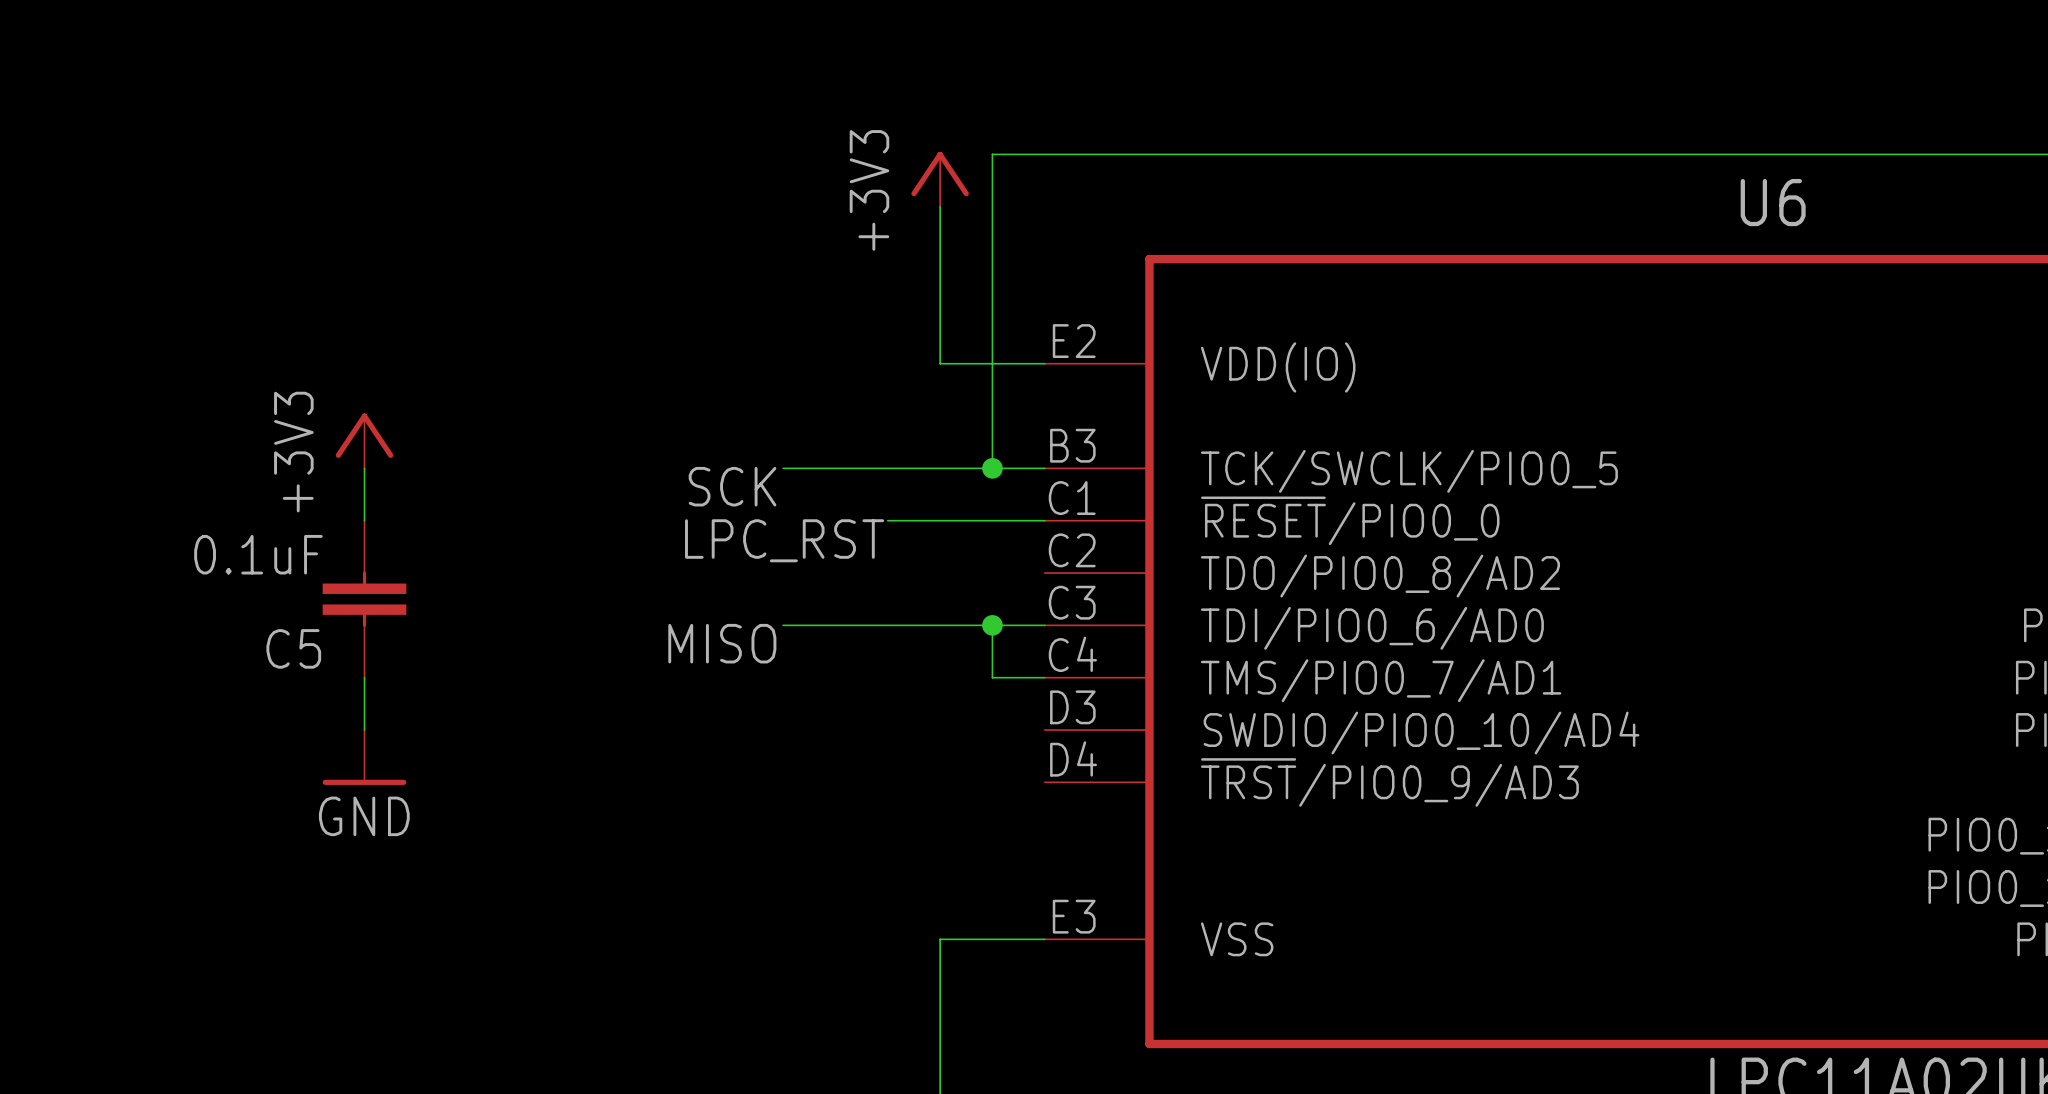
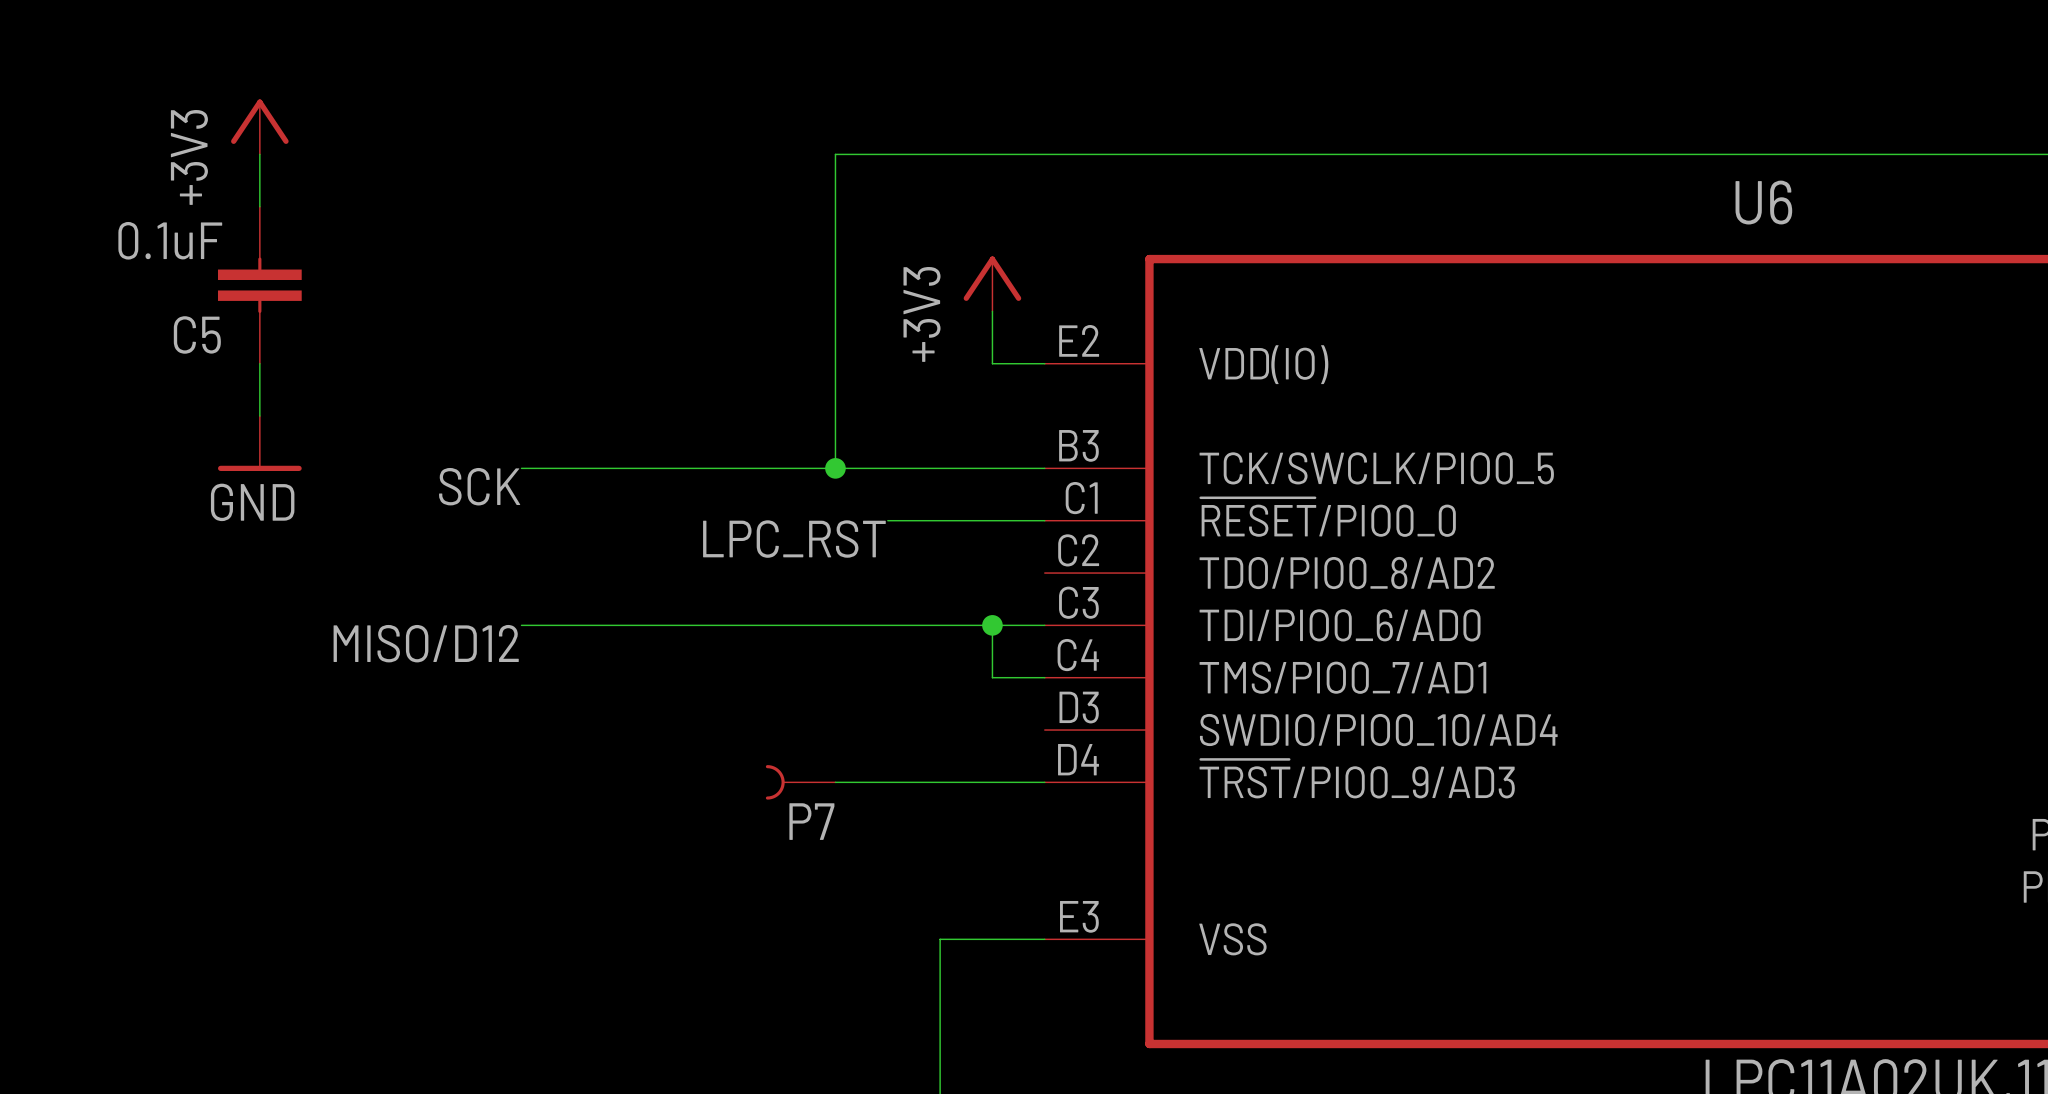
power symbol: none -> +3V3 (259, 126)
wire: (992, 154) (992, 311) -> (992, 154) (835, 154) (835, 468)
power symbol position: +3V3 (940, 179) -> +3V3 (992, 283)
wire: (940, 206) (940, 363) (992, 363) (992, 468) -> none
power symbol: +3V3 (364, 440) -> none
wire: (364, 468) (364, 520) -> (259, 154) (259, 206)
wire: none -> (521, 468) (783, 468)
junction: none -> (835, 468)
junction: (992, 468) -> none
label position: SCK (732, 486) -> SCK (479, 486)
C5 position: (364, 599) -> (259, 285)
wire: none -> (521, 625) (783, 625)
label: MISO (722, 643) -> none
label: none -> MISO/D12 (426, 643)
wire: (364, 677) (364, 730) -> (259, 363) (259, 416)
power symbol position: GND (364, 757) -> GND (259, 443)
P7: none -> (800, 782)
wire: none -> (835, 782) (1044, 782)

